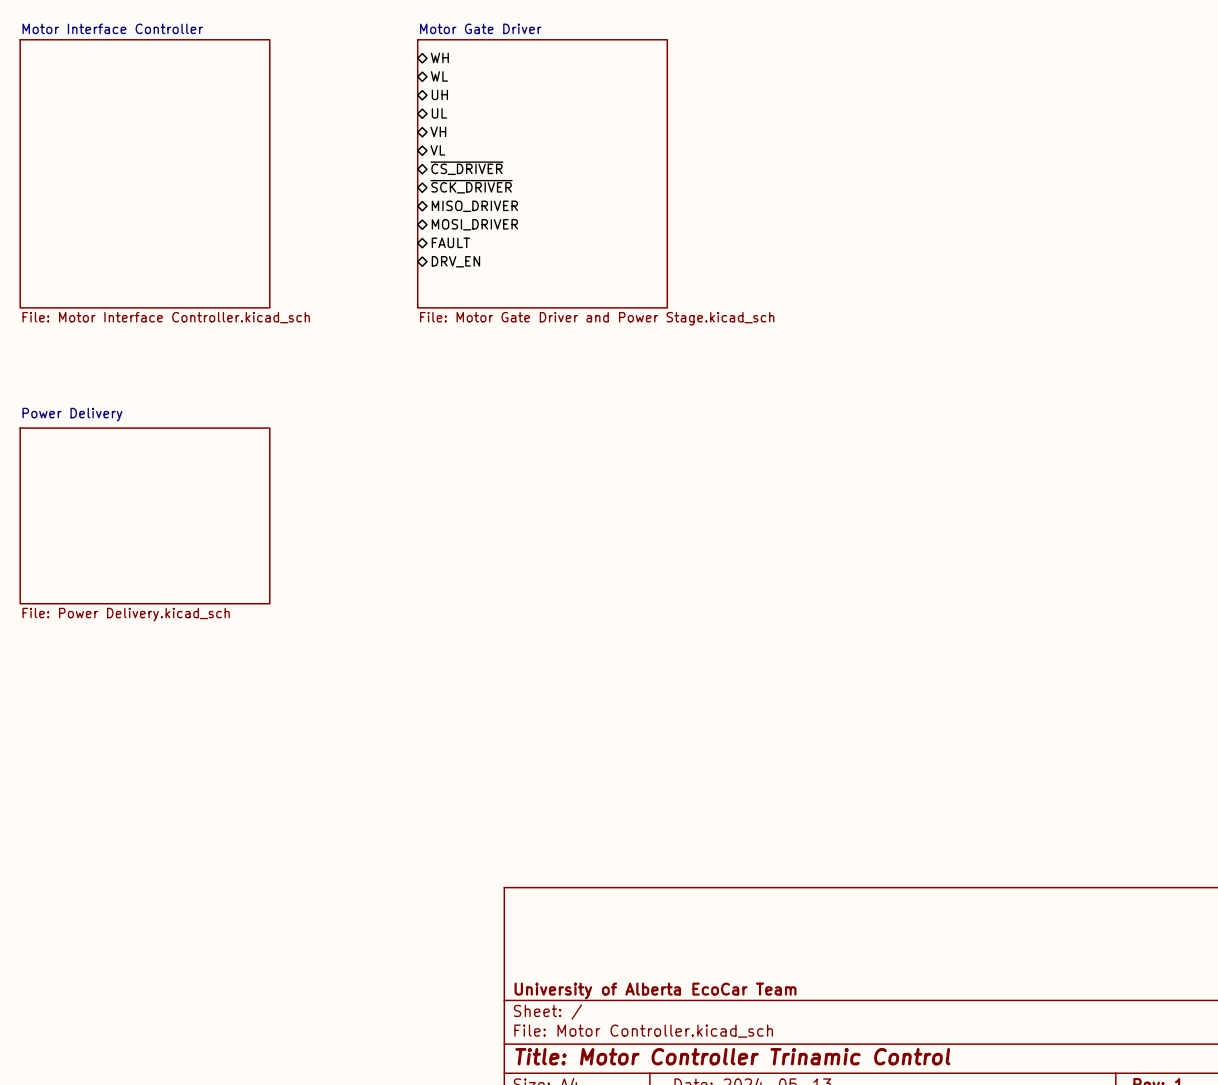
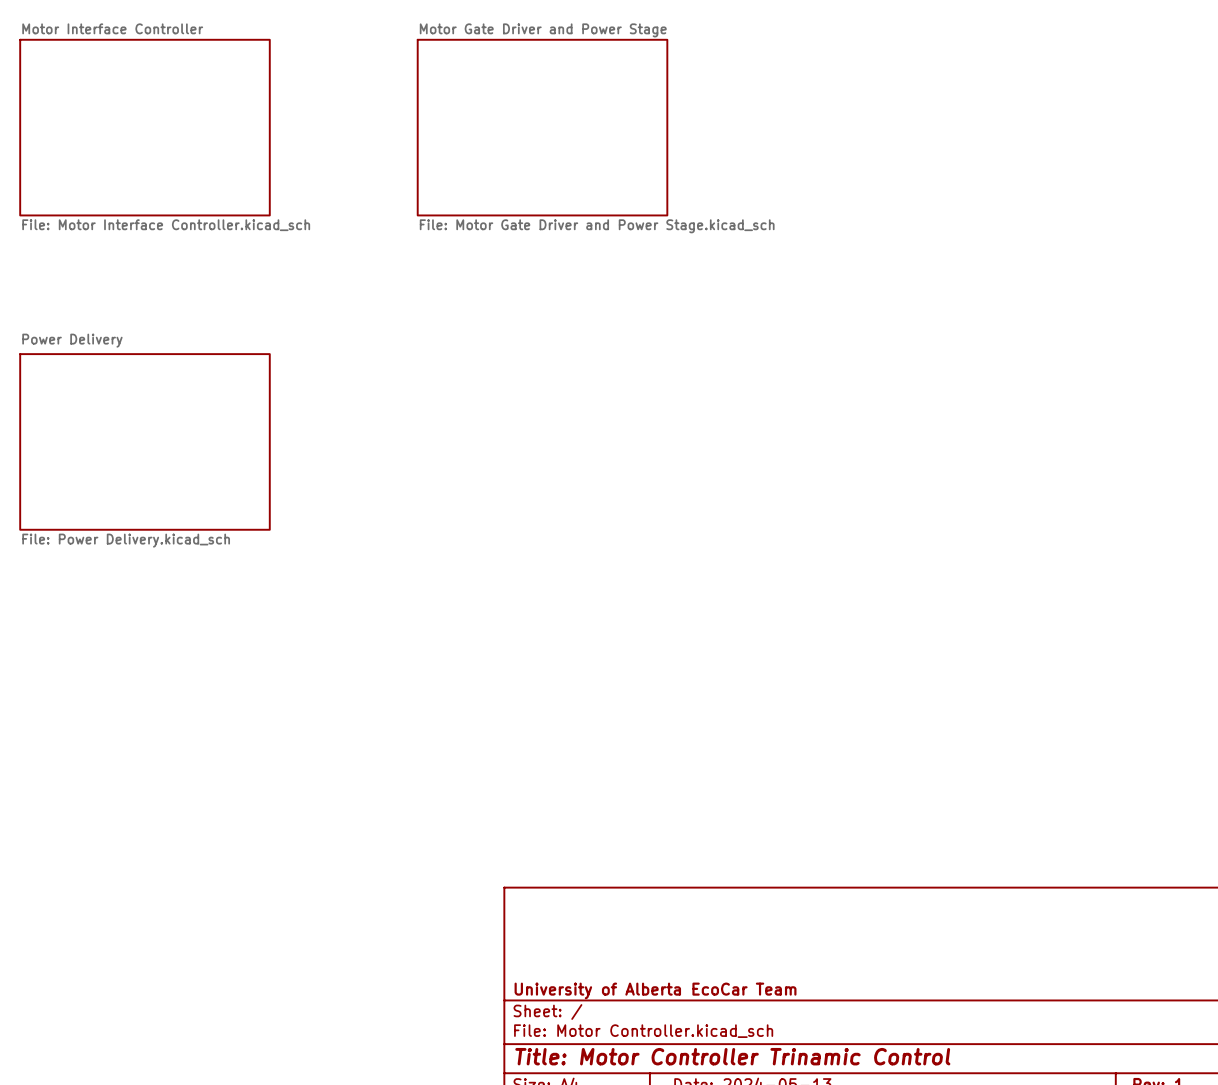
sheet pin: WH (439, 57) -> none
sheet pin: WL (439, 76) -> none
sheet pin: UH (439, 94) -> none
sheet pin: UL (439, 113) -> none
sheet Motor Interface Controller: none -> File: Motor Interface Controller.kicad_sch (144, 127)
sheet Motor Gate Driver and Power Stage: none -> File: Motor Gate Driver and Power Stage.kicad_sch (542, 127)
sheet pin: VH (438, 131) -> none
sheet pin: VL (437, 150) -> none
sheet pin: ~{CS_DRIVER} (466, 168) -> none
sheet Motor Interface Controller: File: Motor Interface Controller.kicad_sch (144, 173) -> none
sheet Motor Gate Driver: File: Motor Gate Driver and Power Stage.kicad_sch (542, 173) -> none
sheet pin: ~{SCK_DRIVER} (471, 186) -> none
sheet pin: MISO_DRIVER (474, 206) -> none
sheet pin: MOSI_DRIVER (474, 224) -> none
sheet pin: FAULT (450, 242) -> none
sheet pin: DRV_EN (455, 261) -> none
sheet Power Delivery position: (144, 515) -> (144, 441)

